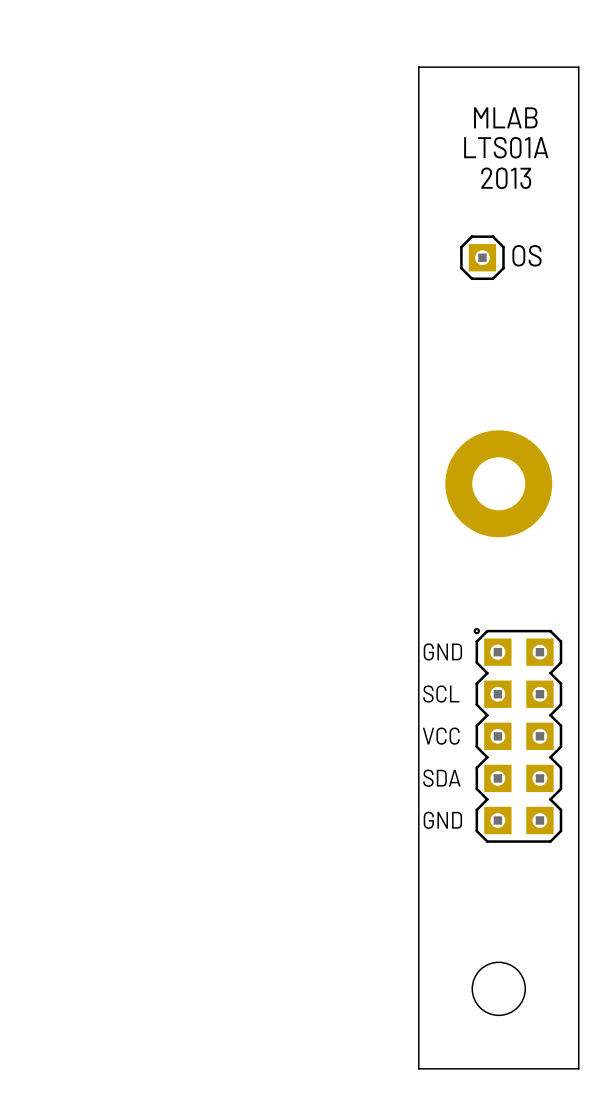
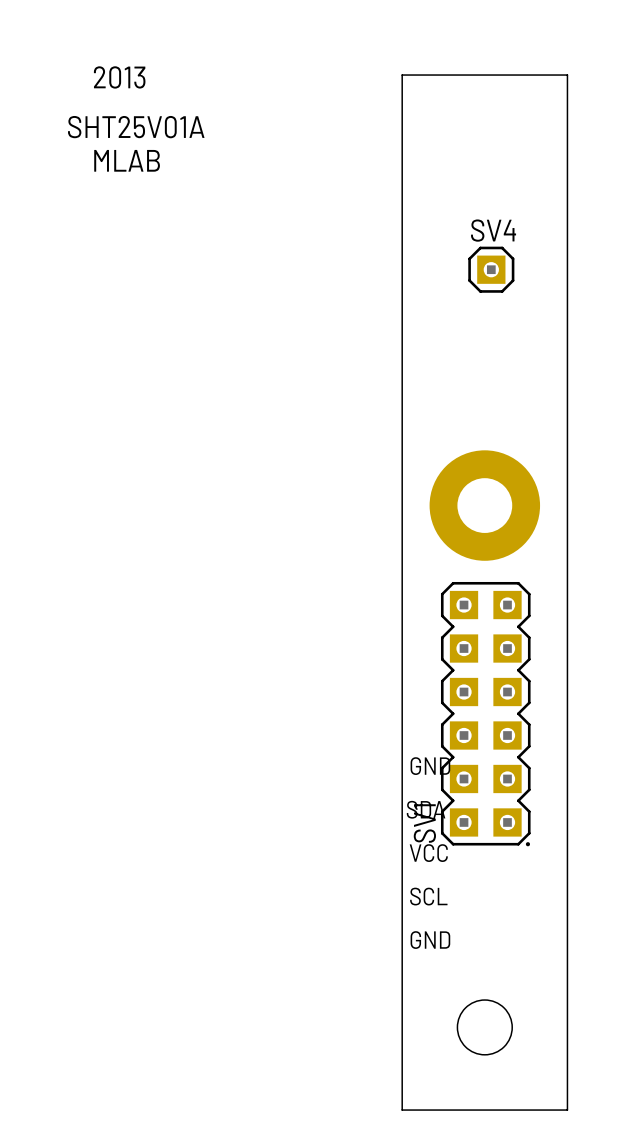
text: none -> SHT25V01A (136, 127)
text position: MLAB (505, 117) -> MLAB (127, 160)
text: LTS01A (506, 147) -> none
text position: 2013 (506, 178) -> 2013 (119, 77)
SV4: none -> (491, 269)
text: OS (527, 255) -> none
part: (482, 257) -> none
text: GND (442, 651) -> none
SV1: none -> (485, 714)
text position: SCL (441, 694) -> SCL (428, 896)
text: none -> GND (430, 766)
part: (517, 735) -> none
text position: VCC (441, 736) -> VCC (428, 853)
text: GND (442, 820) -> none
text: none -> GND (430, 940)

